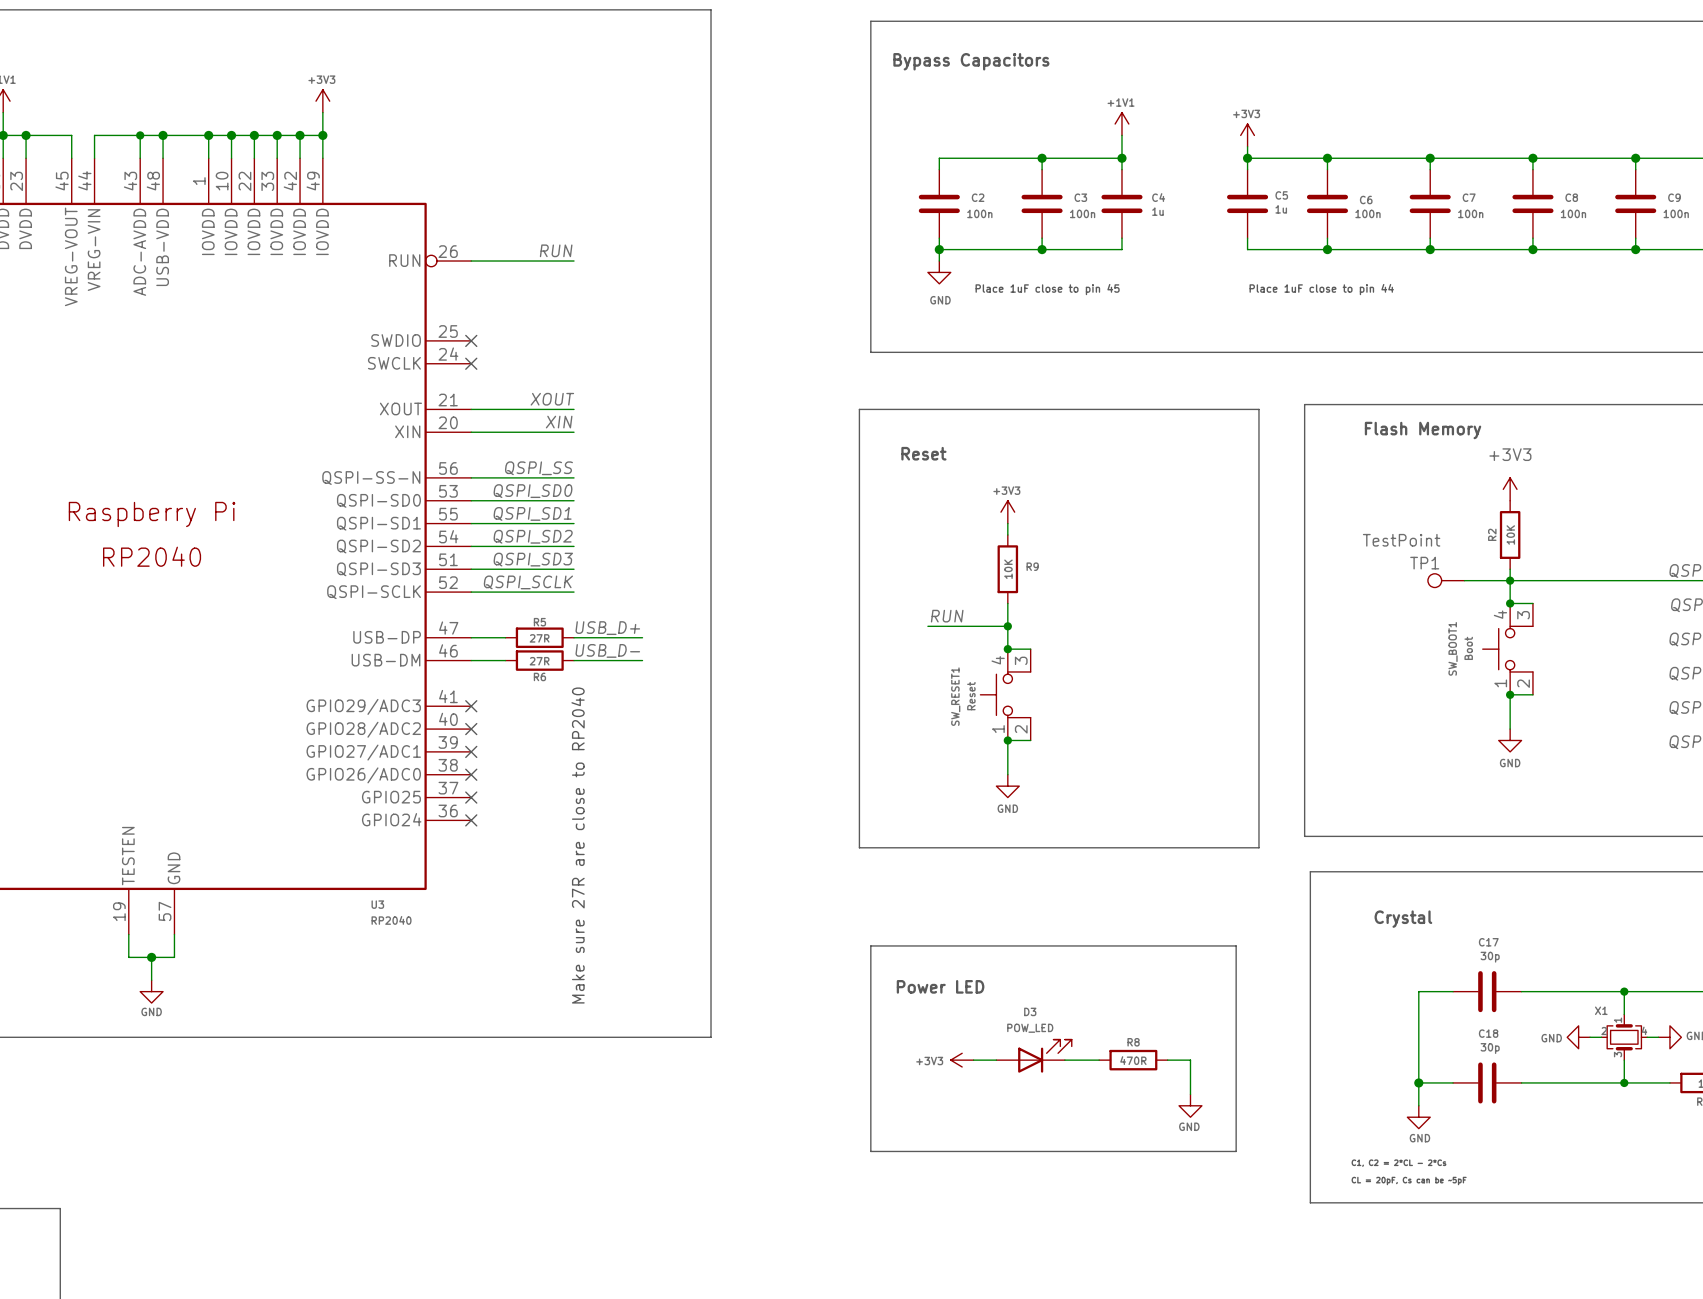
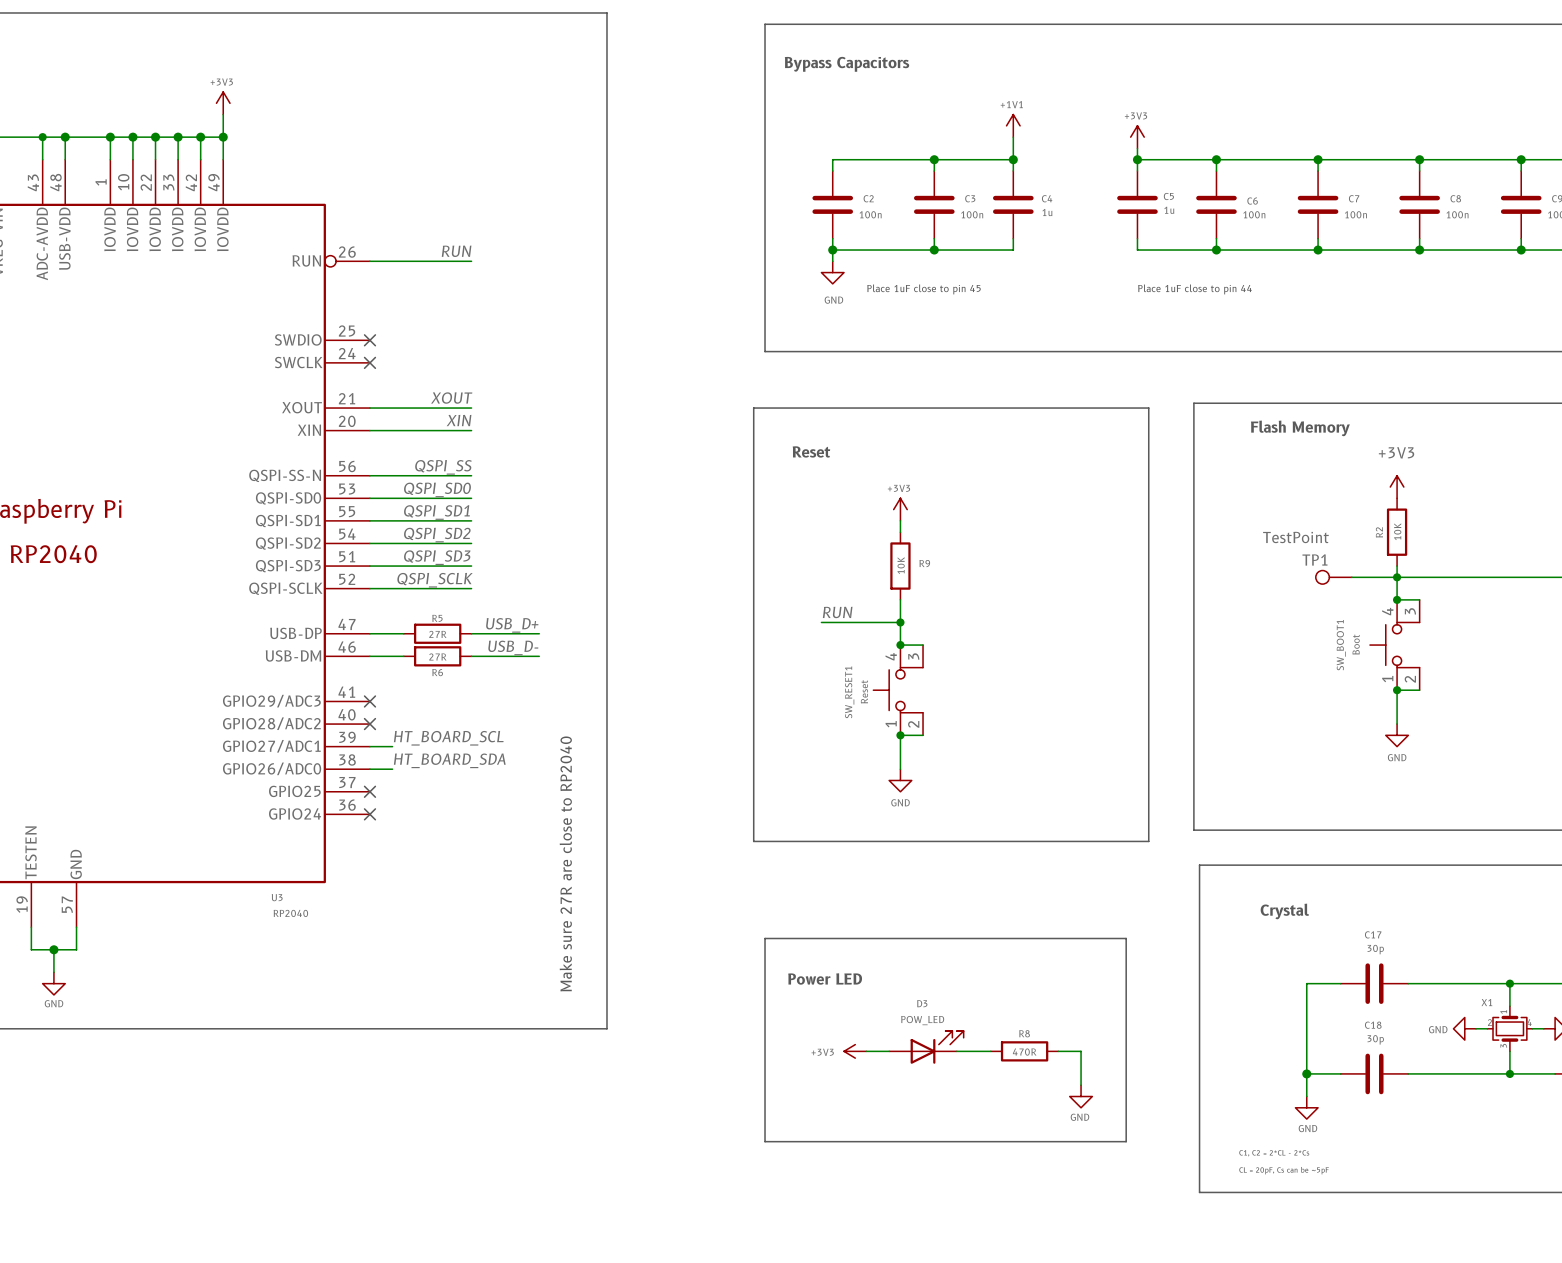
label: none -> HT_BOARD_SCL (448, 738)
wire: none -> (369, 746) (392, 746)
no-connect mark: (471, 751) -> none
label: none -> HT_BOARD_SDA (449, 760)
wire: none -> (369, 769) (392, 769)
no-connect mark: (471, 774) -> none
text position: Make sure 27R are close to RP2040 (578, 845) -> Make sure 27R are close to RP2040 (565, 863)

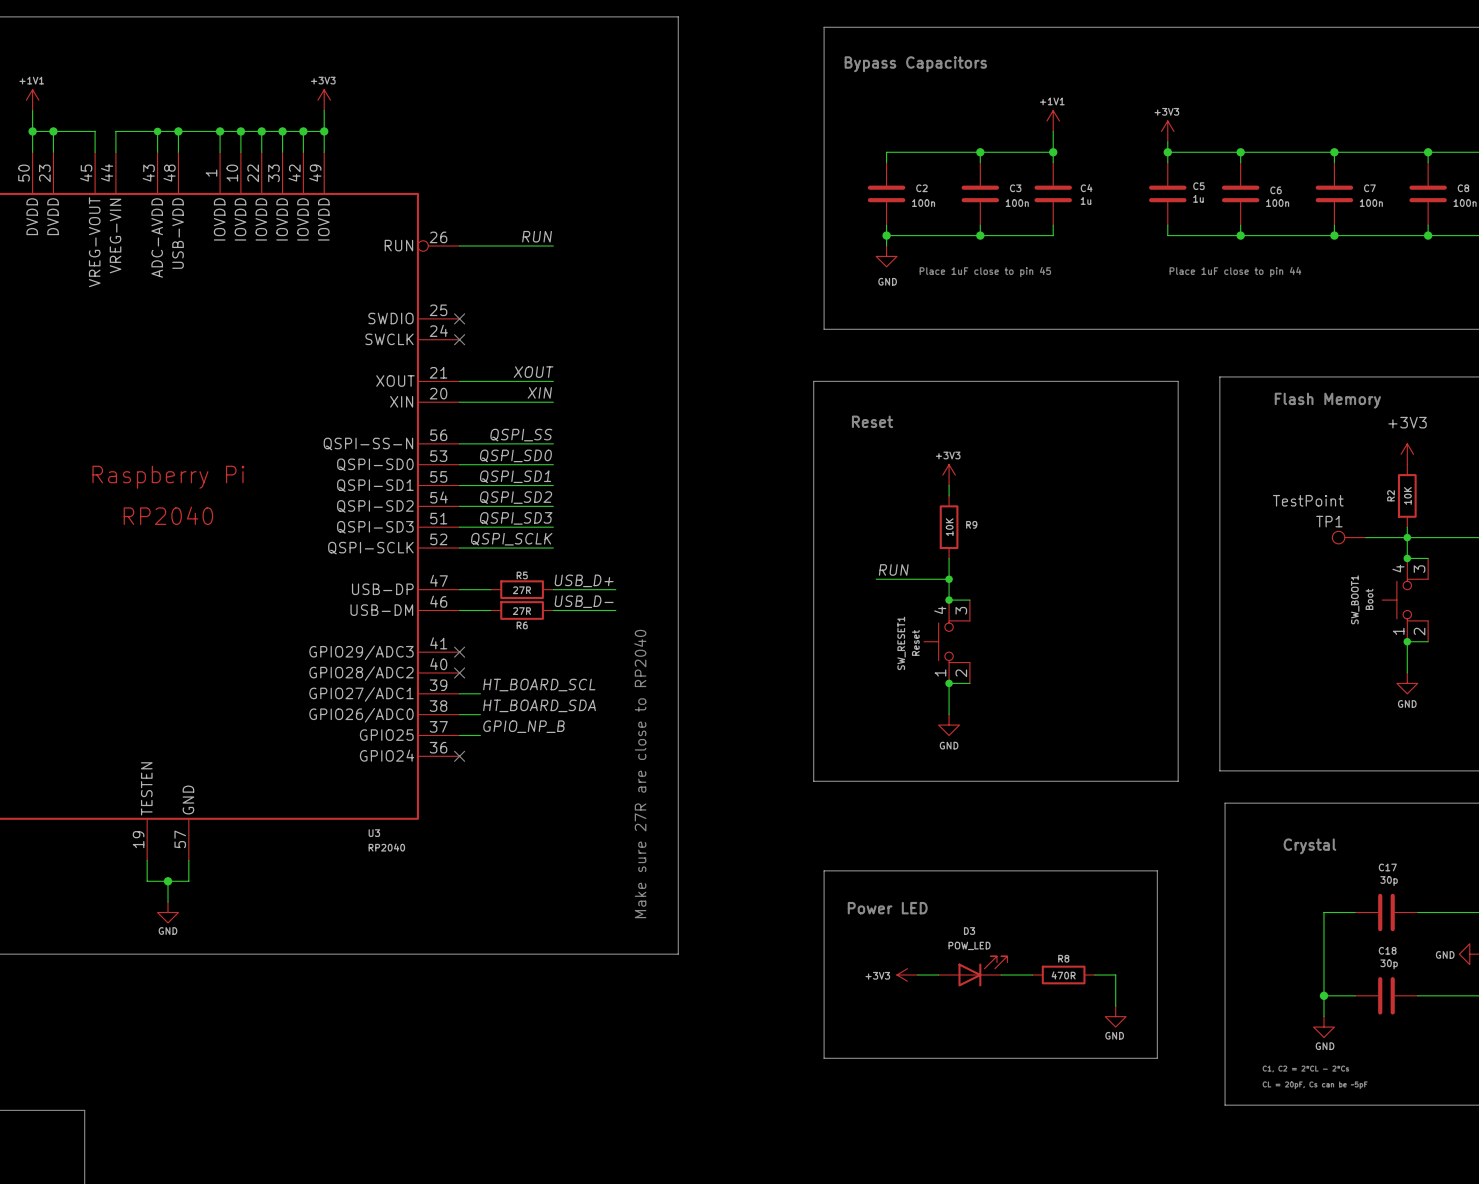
label: none -> GPIO_NP_B (523, 726)
wire: none -> (459, 735) (480, 735)
no-connect mark: (369, 791) -> none

